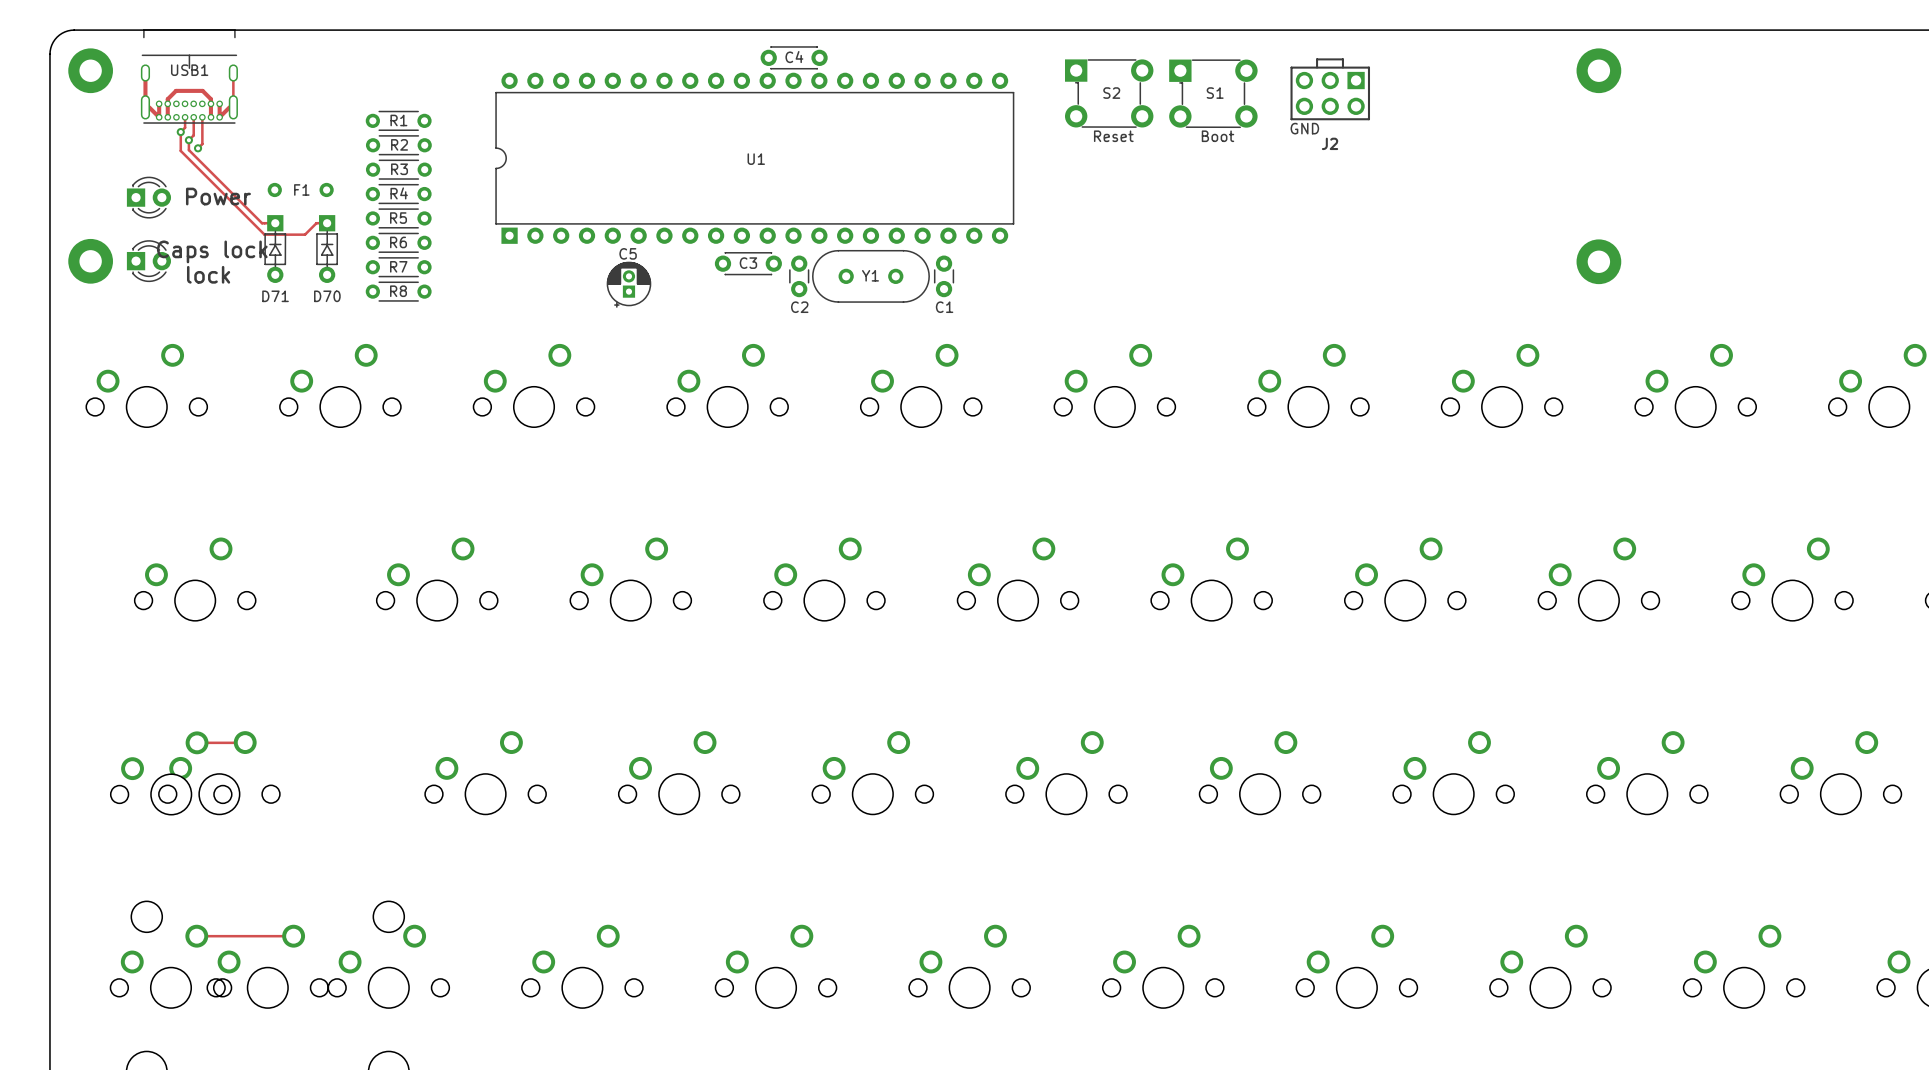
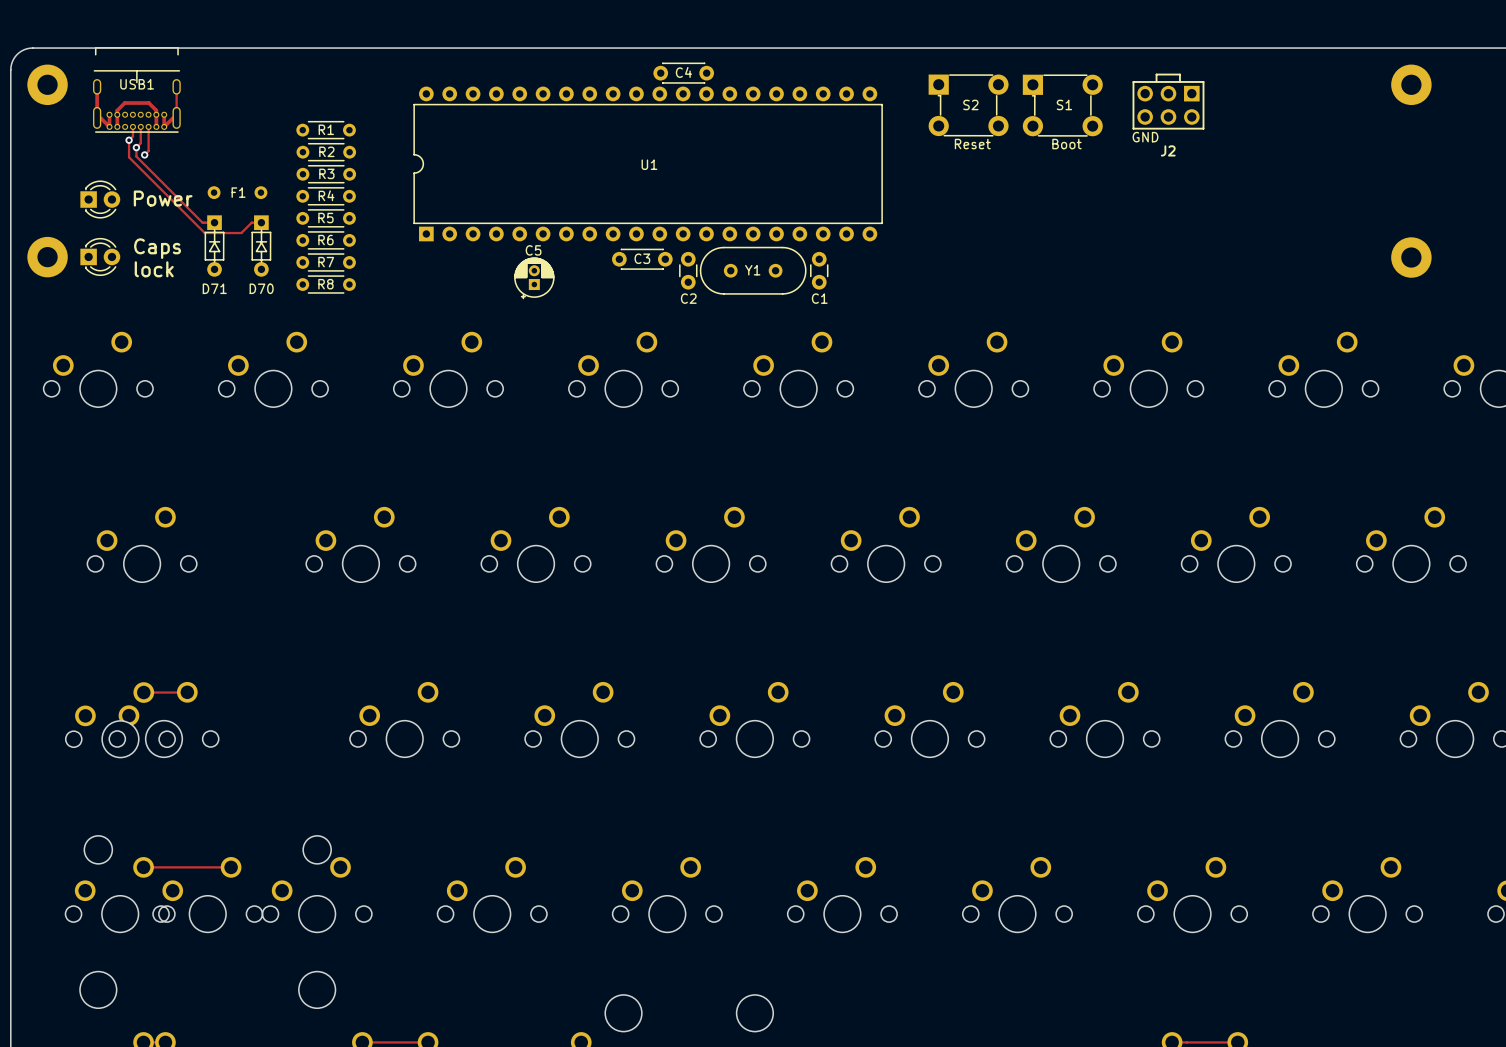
part value: Caps lock (212, 251) -> Caps (157, 248)

